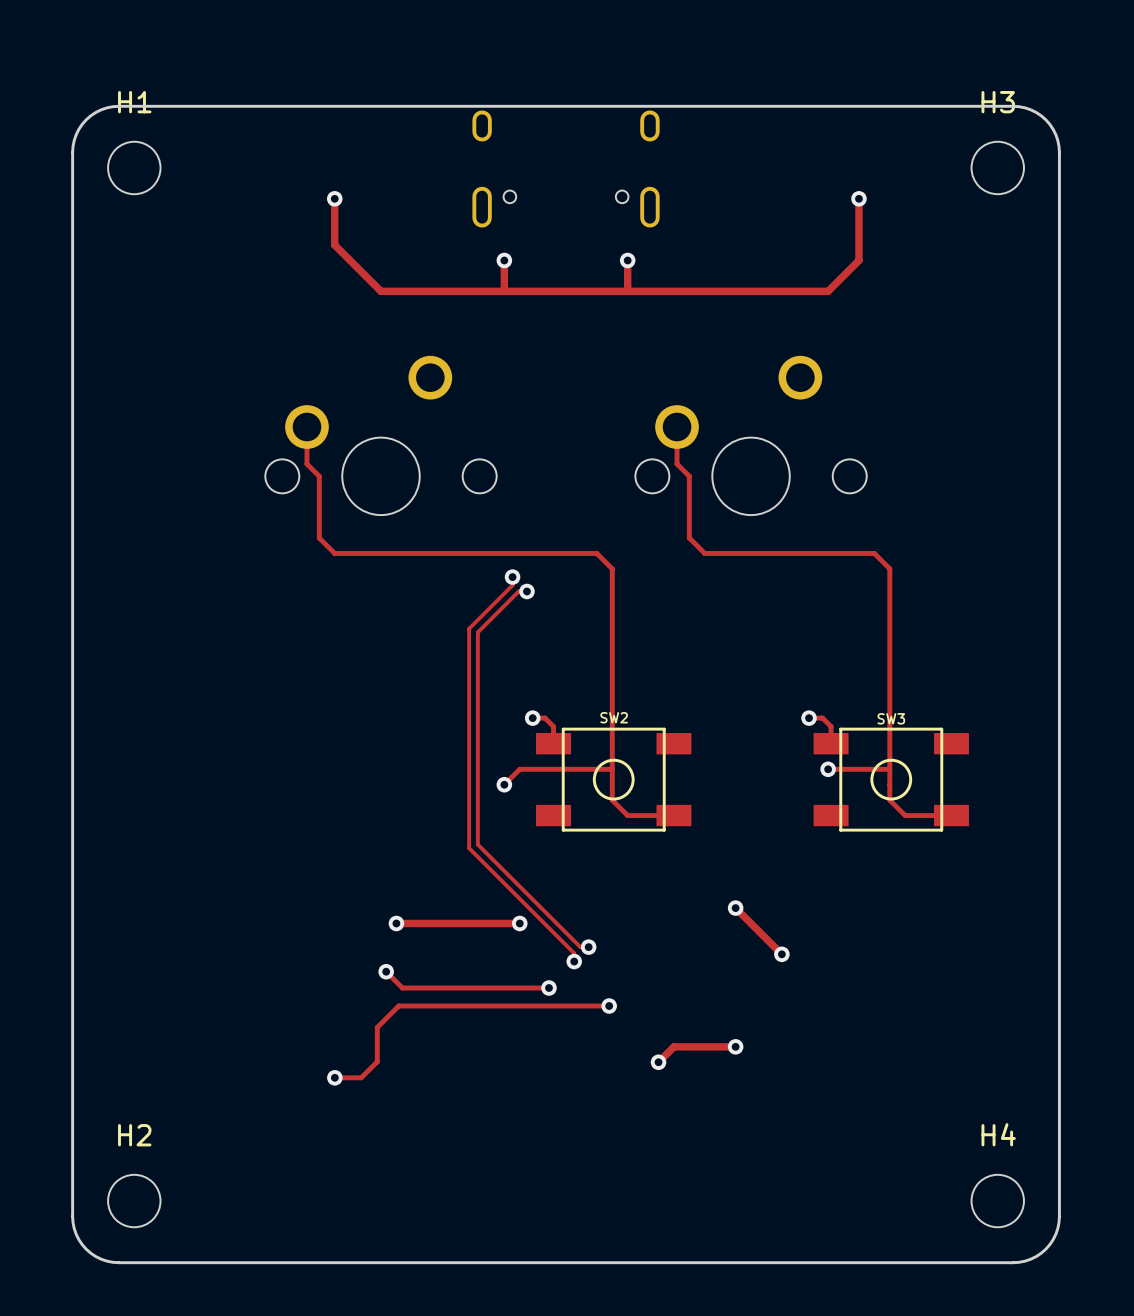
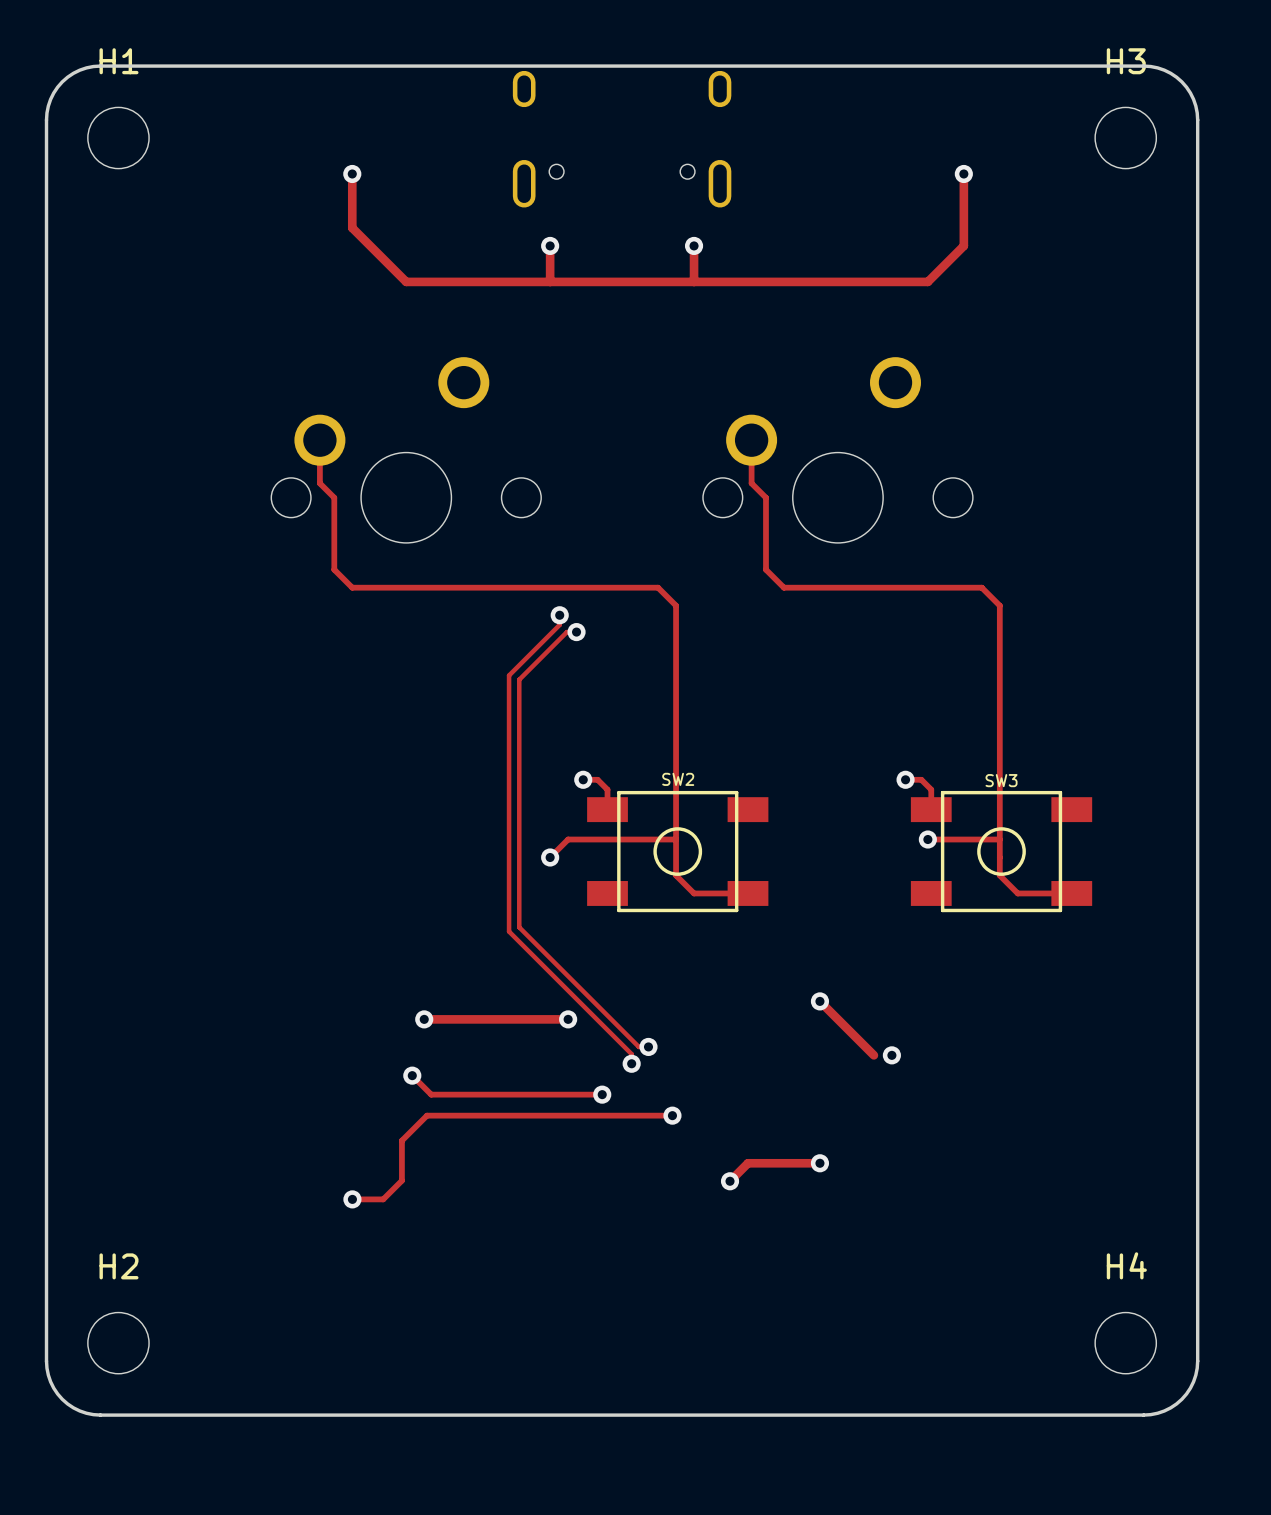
via position: (781, 954) -> (891, 1055)

